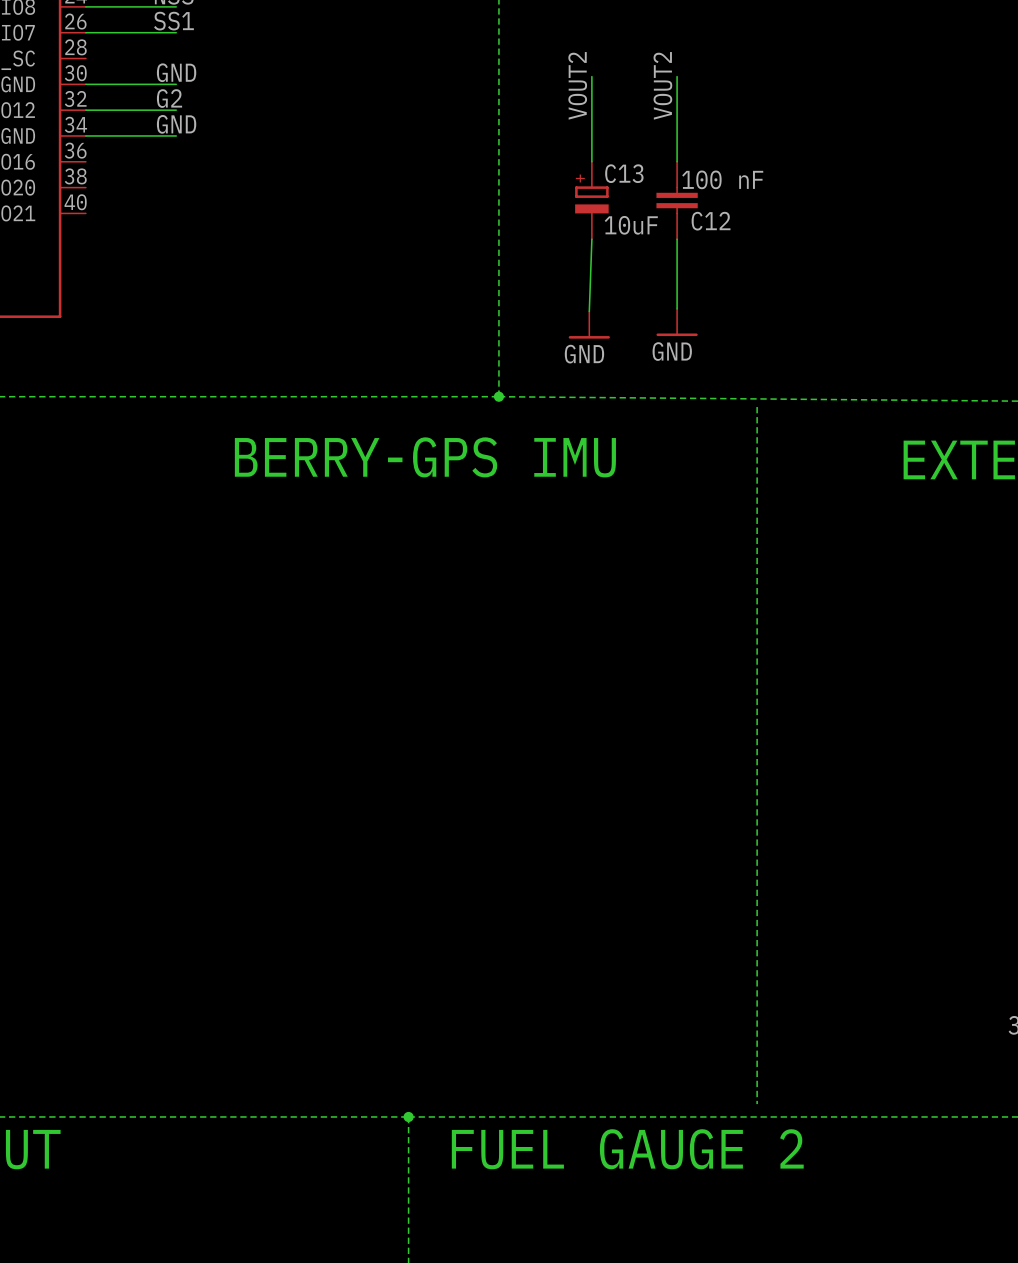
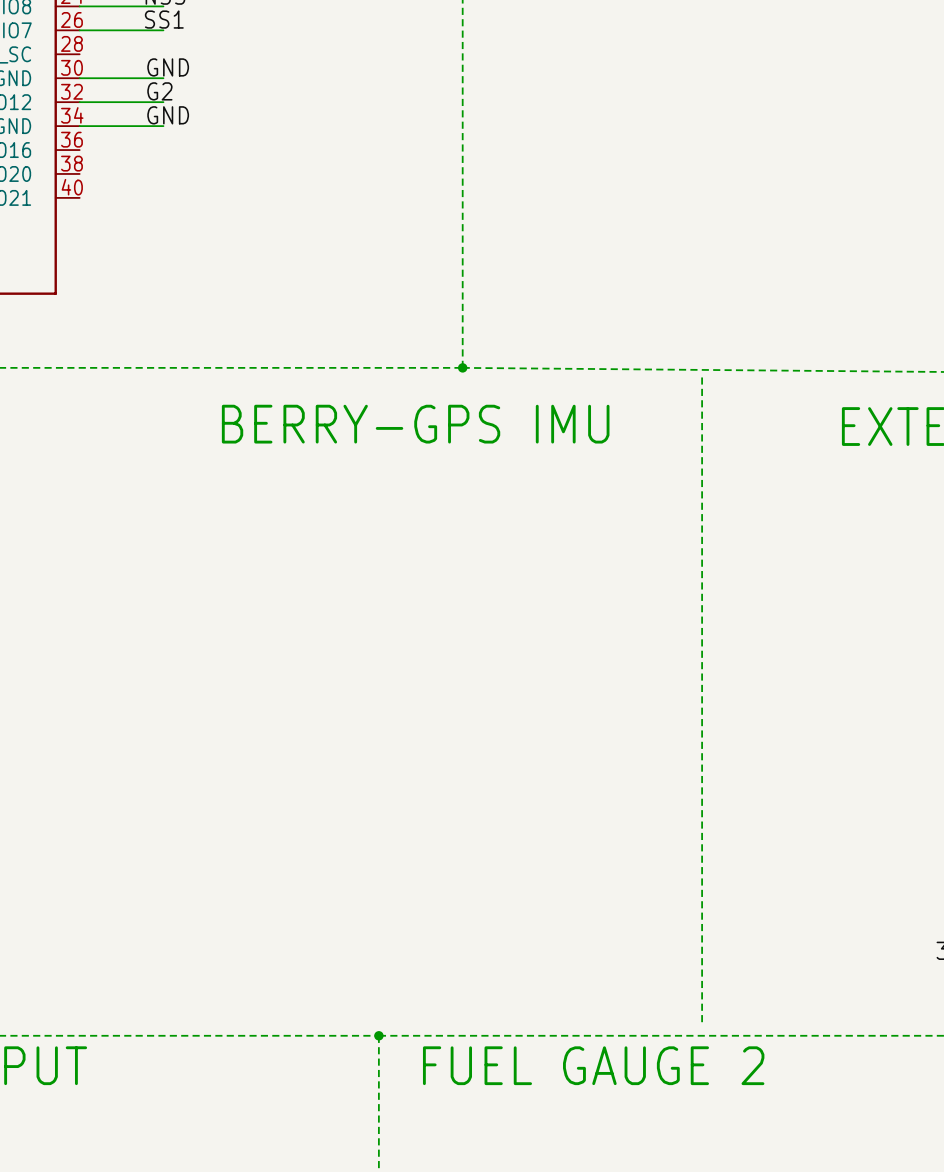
wire: (591, 76) (591, 161) -> none
wire: (677, 76) (677, 161) -> none
label: VOUT2 (577, 85) -> none
label: VOUT2 (662, 85) -> none
C13: 10uF (591, 200) -> none
C12: 100 nF (677, 200) -> none
wire: (591, 239) (589, 311) -> none
wire: (677, 239) (677, 308) -> none
power symbol: GND (677, 322) -> none
power symbol: GND (589, 325) -> none

